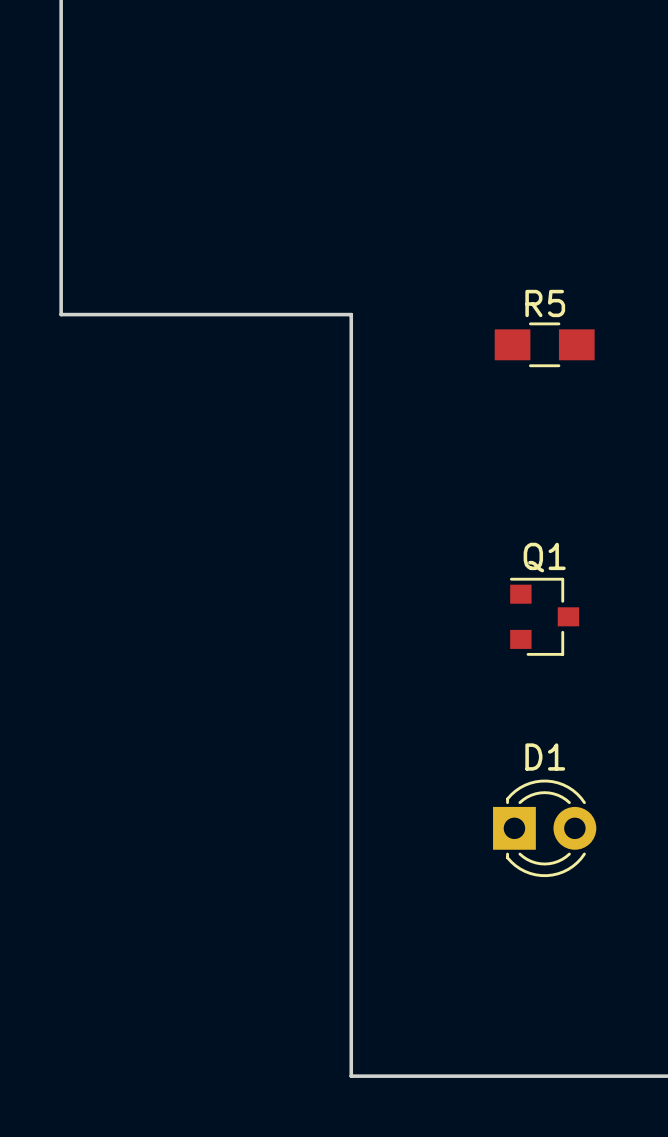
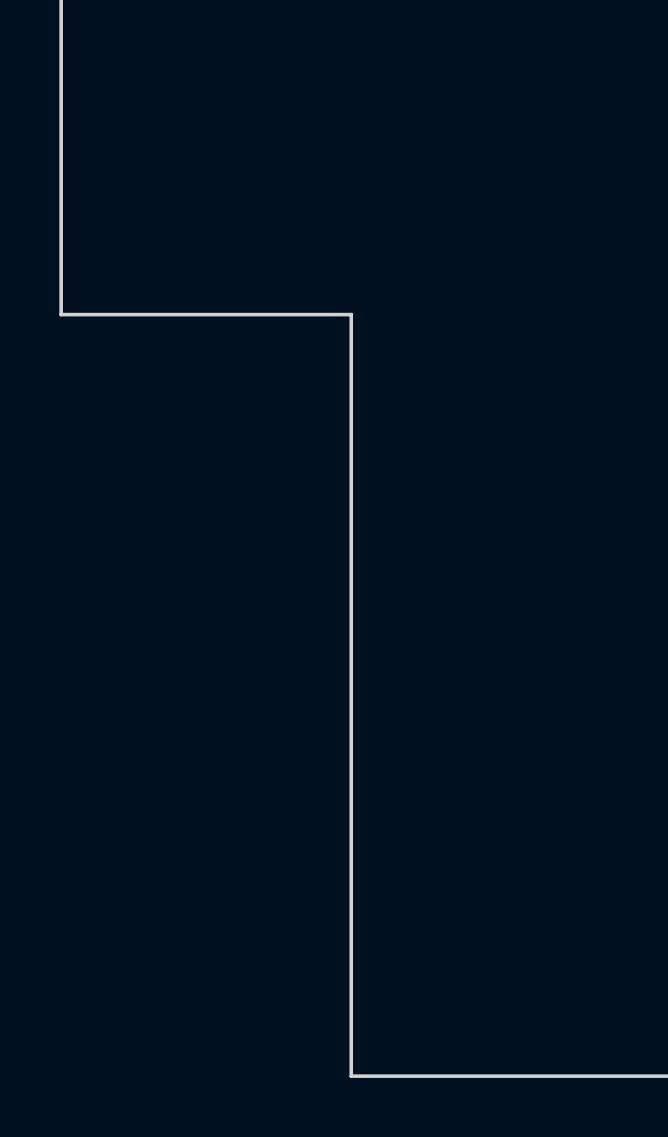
R5: (544, 344) -> none
Q1: (544, 616) -> none
D1: (544, 828) -> none

